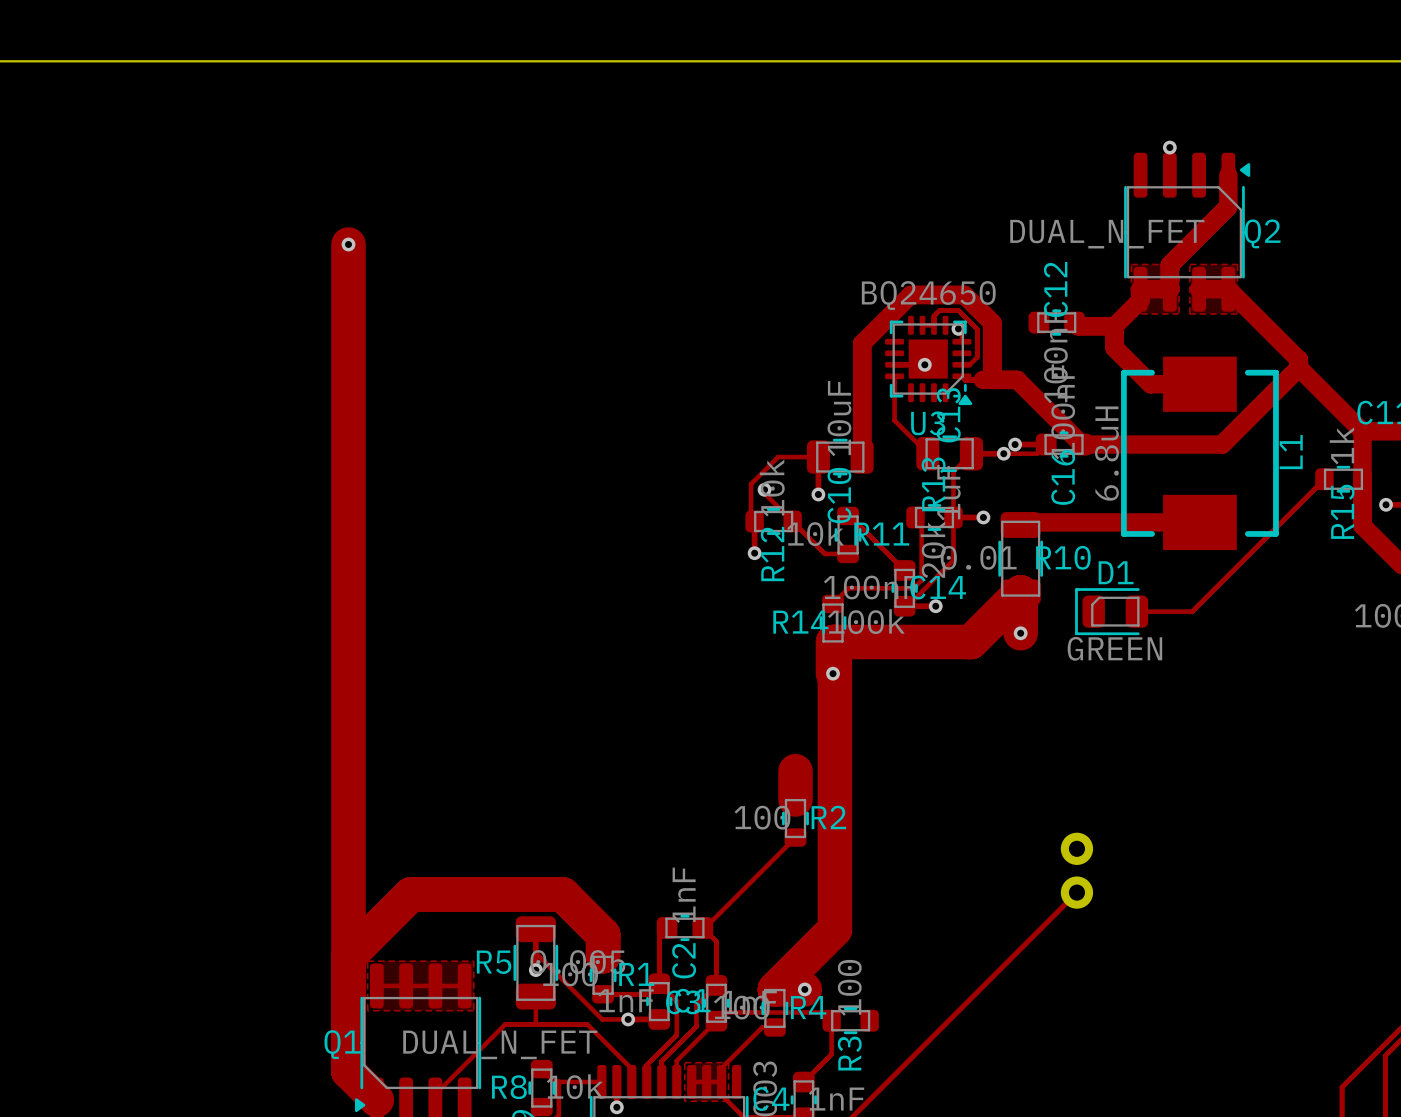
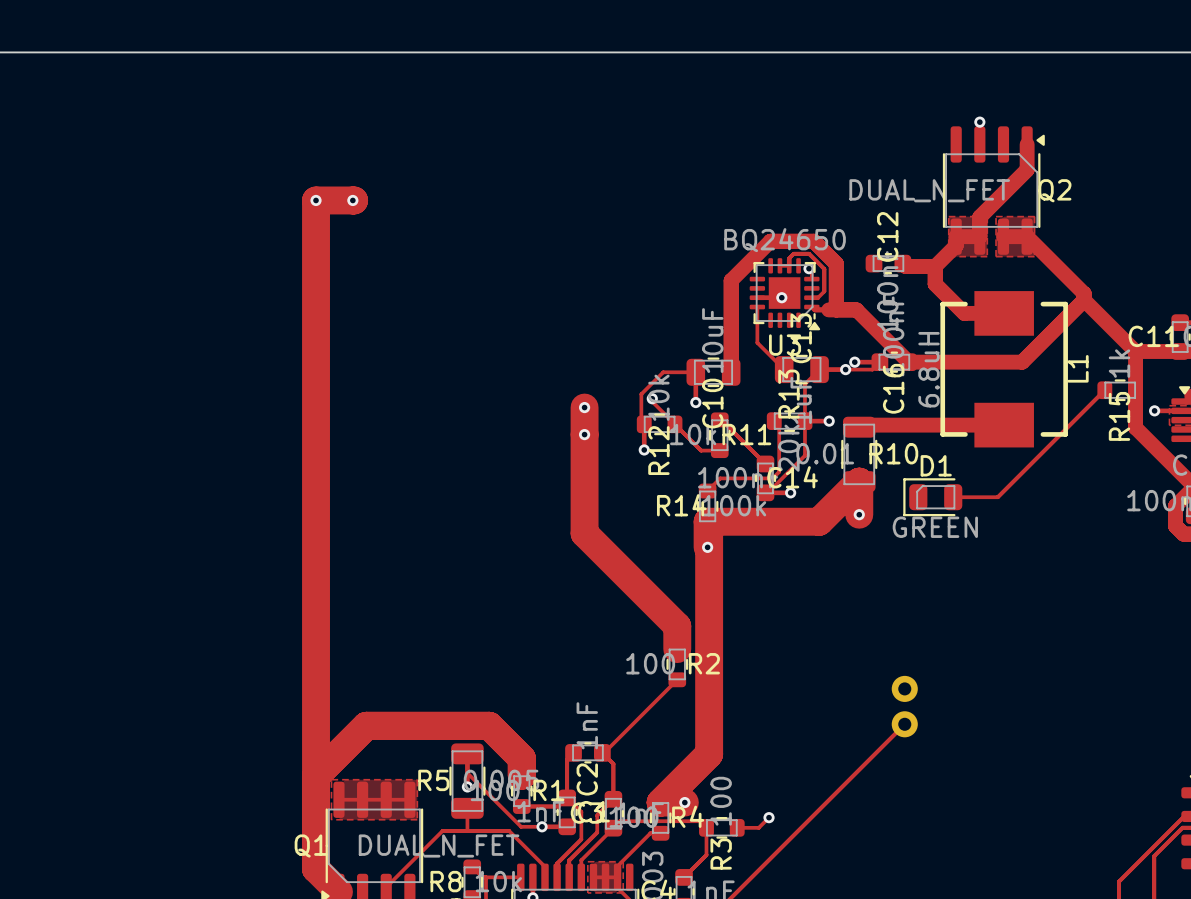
track: none -> (316, 200) (354, 200)
via: none -> (352, 200)
track: none -> (584, 407) (584, 533) (677, 626)
via: none -> (584, 407)
via: none -> (584, 434)
track: none -> (769, 817) (758, 827) (737, 827)
via: none -> (769, 817)

